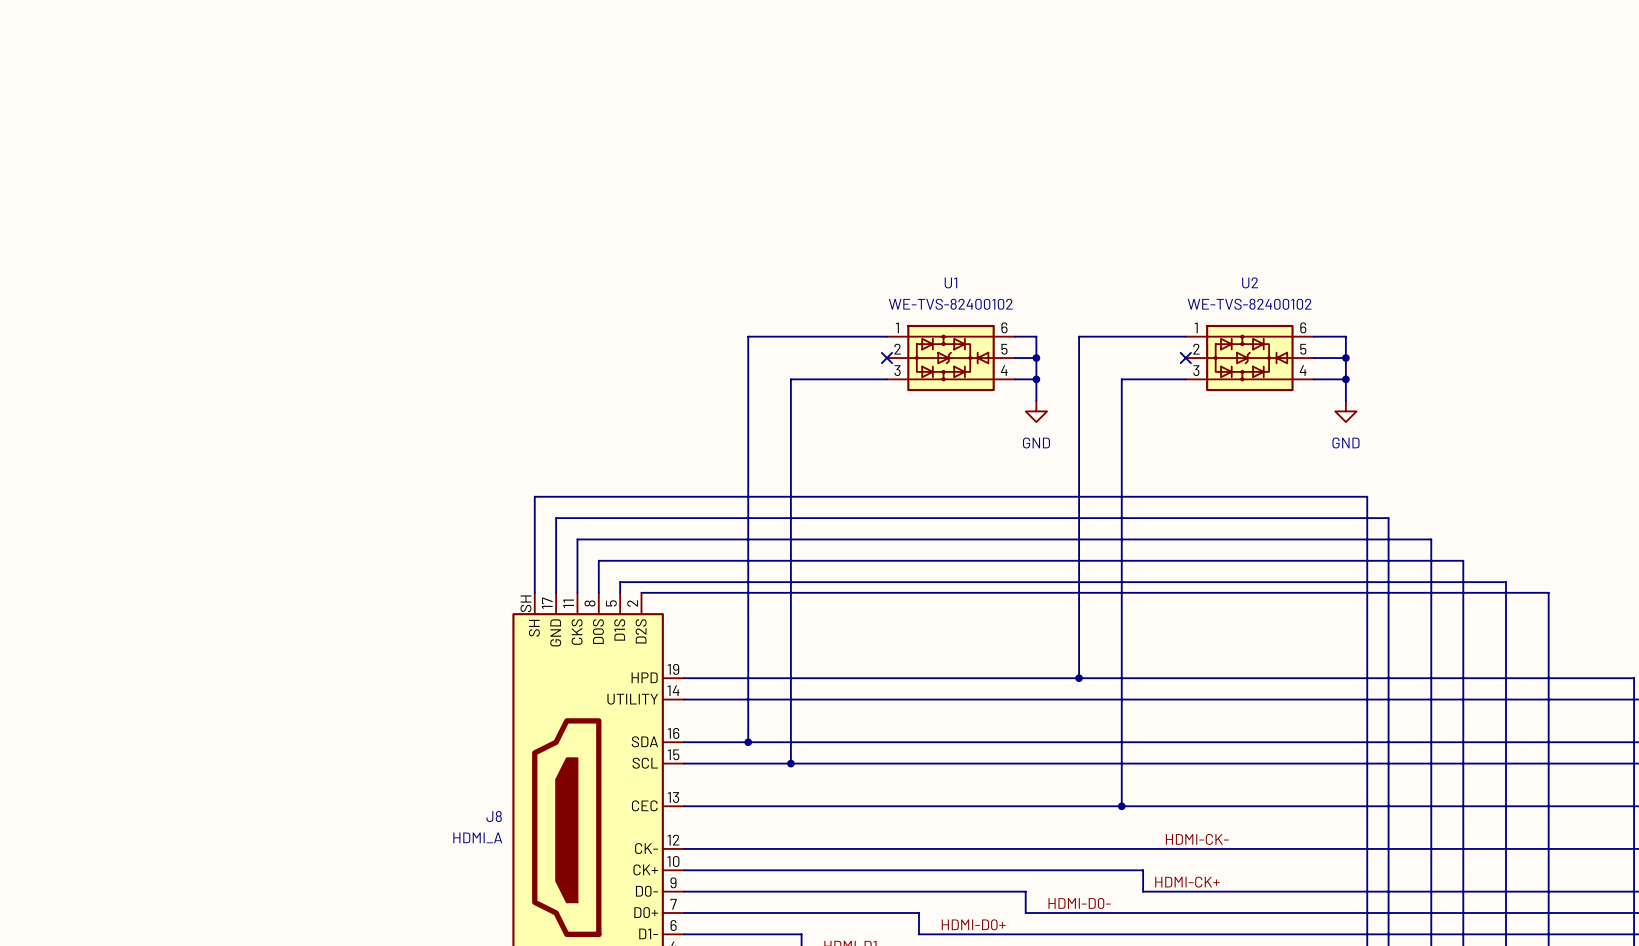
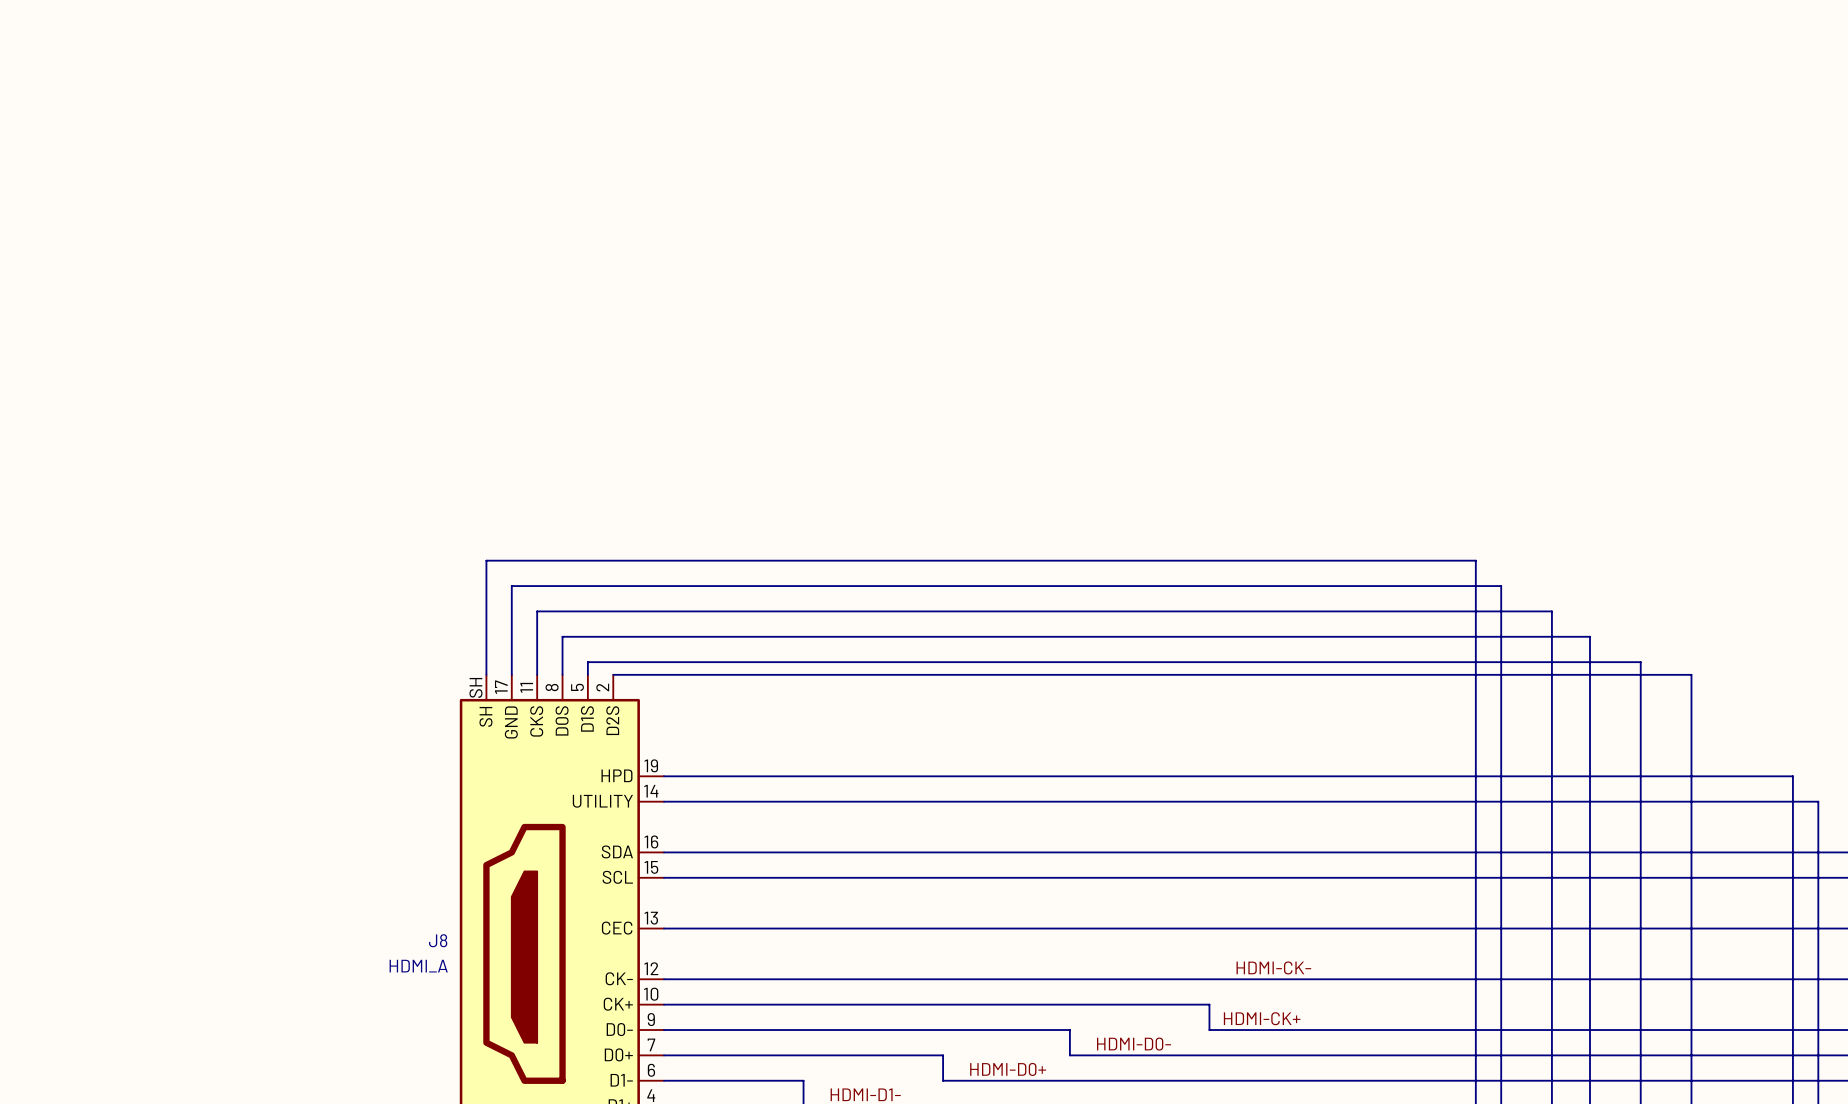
wire: (886, 336) (748, 336) (748, 742) -> none
wire: (1015, 336) (1036, 336) (1036, 400) -> none
wire: (1185, 336) (1079, 336) (1079, 678) -> none
wire: (1313, 336) (1345, 336) (1345, 400) -> none
no-connect mark: (886, 358) -> none
U1: WE-TVS-82400102 (951, 358) -> none
wire: (1015, 358) (1036, 358) -> none
junction: (1036, 358) -> none
no-connect mark: (1185, 358) -> none
U2: WE-TVS-82400102 (1249, 358) -> none
wire: (1313, 358) (1345, 358) -> none
junction: (1345, 358) -> none
wire: (886, 379) (790, 379) (790, 763) -> none
wire: (1015, 379) (1036, 379) -> none
junction: (1036, 379) -> none
wire: (1185, 379) (1121, 379) (1121, 806) -> none
wire: (1313, 379) (1345, 379) -> none
junction: (1345, 379) -> none
power symbol: GND (1036, 411) -> none
power symbol: GND (1345, 411) -> none
junction: (1079, 678) -> none
junction: (748, 742) -> none
junction: (790, 763) -> none
junction: (1121, 806) -> none

